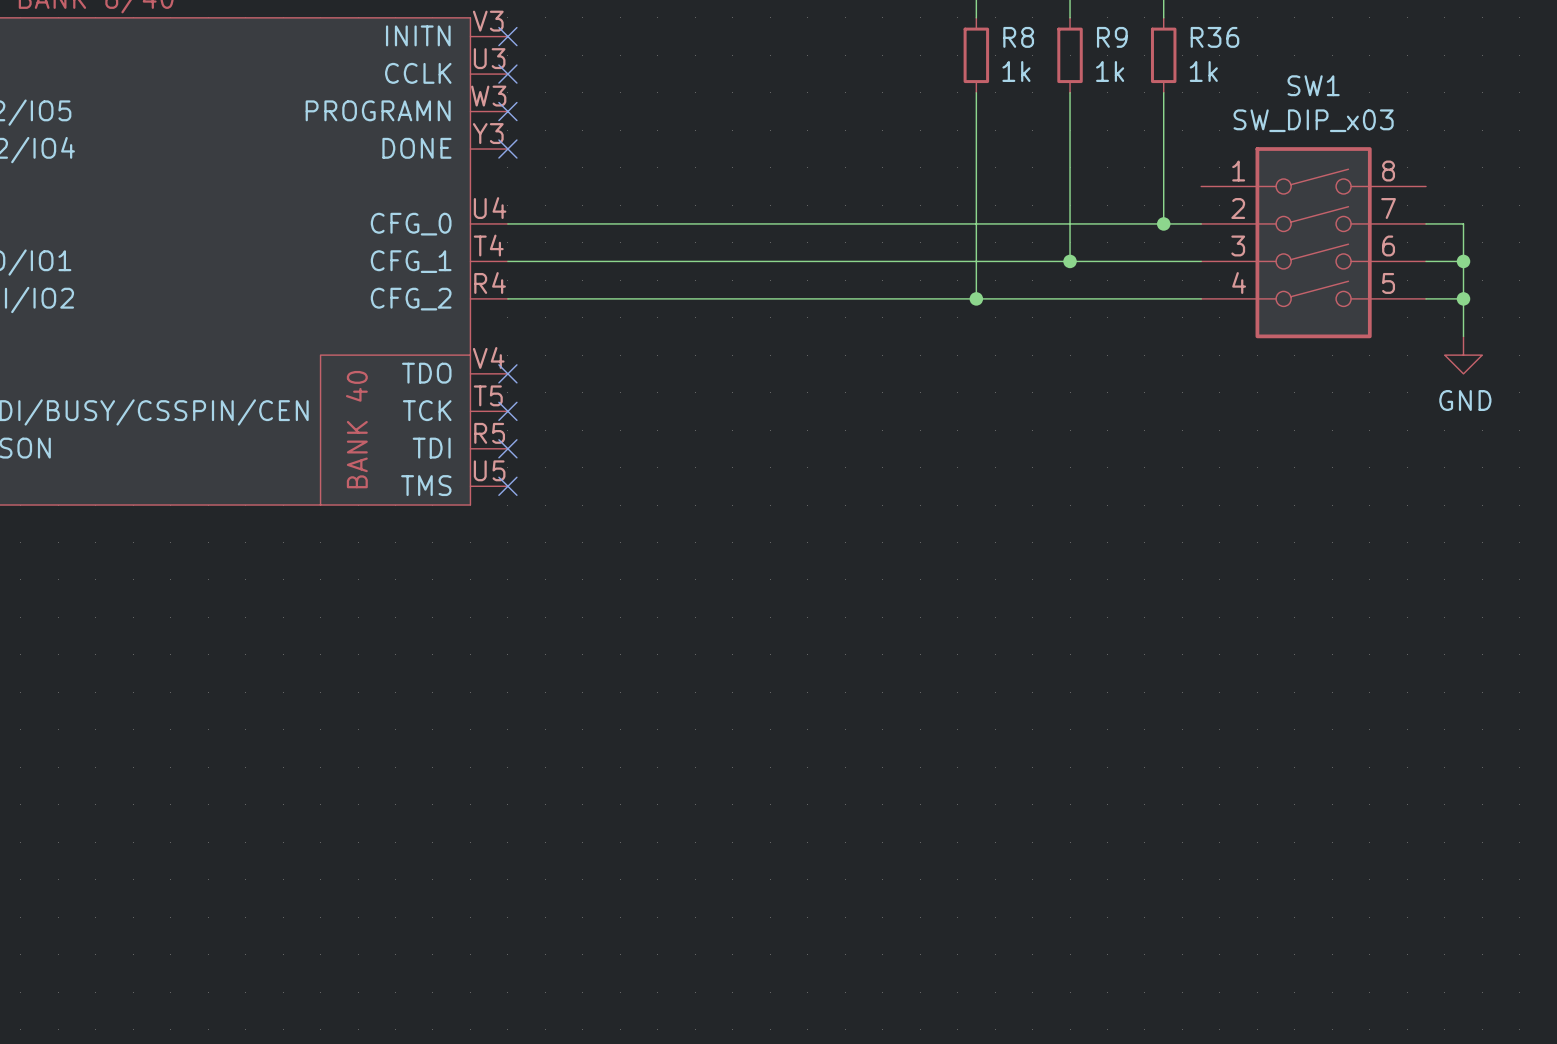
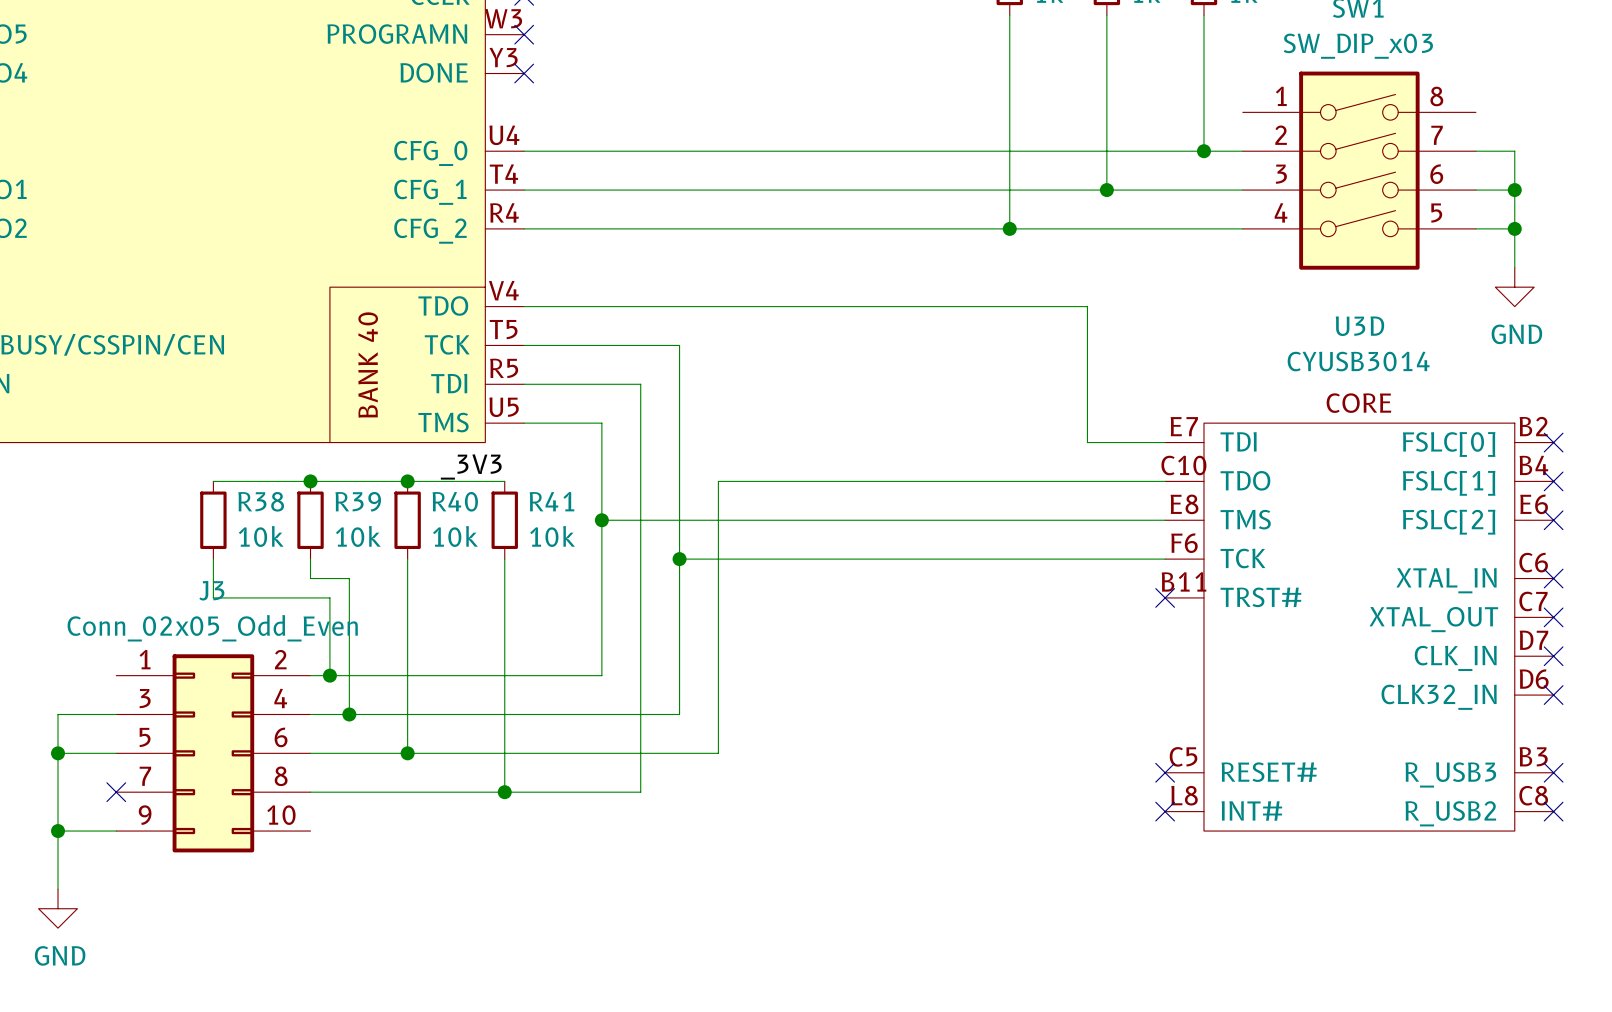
wire: none -> (524, 306) (1087, 306) (1087, 442) (1165, 442)
no-connect mark: (507, 373) -> none
wire: none -> (524, 345) (679, 345) (679, 714) (310, 714)
no-connect mark: (507, 411) -> none
wire: none -> (524, 384) (640, 384) (640, 792) (310, 792)
no-connect mark: (507, 448) -> none
wire: none -> (524, 423) (601, 423) (601, 675) (310, 675)
no-connect mark: (507, 486) -> none
no-connect mark: none -> (1553, 442)
label: none -> _3V3 (471, 466)
wire: none -> (213, 481) (504, 481)
junction: none -> (310, 481)
junction: none -> (407, 481)
wire: none -> (1165, 481) (718, 481) (718, 753) (310, 753)
no-connect mark: none -> (1553, 481)
R38: none -> 10k (213, 520)
R39: none -> 10k (310, 520)
R40: none -> 10k (407, 520)
R41: none -> 10k (504, 520)
wire: none -> (601, 520) (1165, 520)
junction: none -> (601, 520)
no-connect mark: none -> (1553, 520)
wire: none -> (213, 559) (213, 597) (329, 597) (329, 675)
wire: none -> (310, 559) (310, 578) (349, 578) (349, 714)
wire: none -> (407, 559) (407, 753)
wire: none -> (504, 559) (504, 792)
wire: none -> (679, 559) (1165, 559)
junction: none -> (679, 559)
no-connect mark: none -> (1553, 578)
no-connect mark: none -> (1165, 597)
no-connect mark: none -> (1553, 617)
U3D: none -> CYUSB3014 (1359, 627)
no-connect mark: none -> (1553, 656)
junction: none -> (329, 675)
no-connect mark: none -> (1553, 695)
wire: none -> (116, 714) (58, 714) (58, 889)
junction: none -> (349, 714)
wire: none -> (58, 753) (116, 753)
junction: none -> (58, 753)
J3: none -> Conn_02x05_Odd_Even (213, 753)
junction: none -> (407, 753)
no-connect mark: none -> (1165, 772)
no-connect mark: none -> (1553, 772)
no-connect mark: none -> (116, 792)
junction: none -> (504, 792)
no-connect mark: none -> (1165, 811)
no-connect mark: none -> (1553, 811)
wire: none -> (58, 831) (116, 831)
junction: none -> (58, 831)
power symbol: none -> GND (58, 908)

